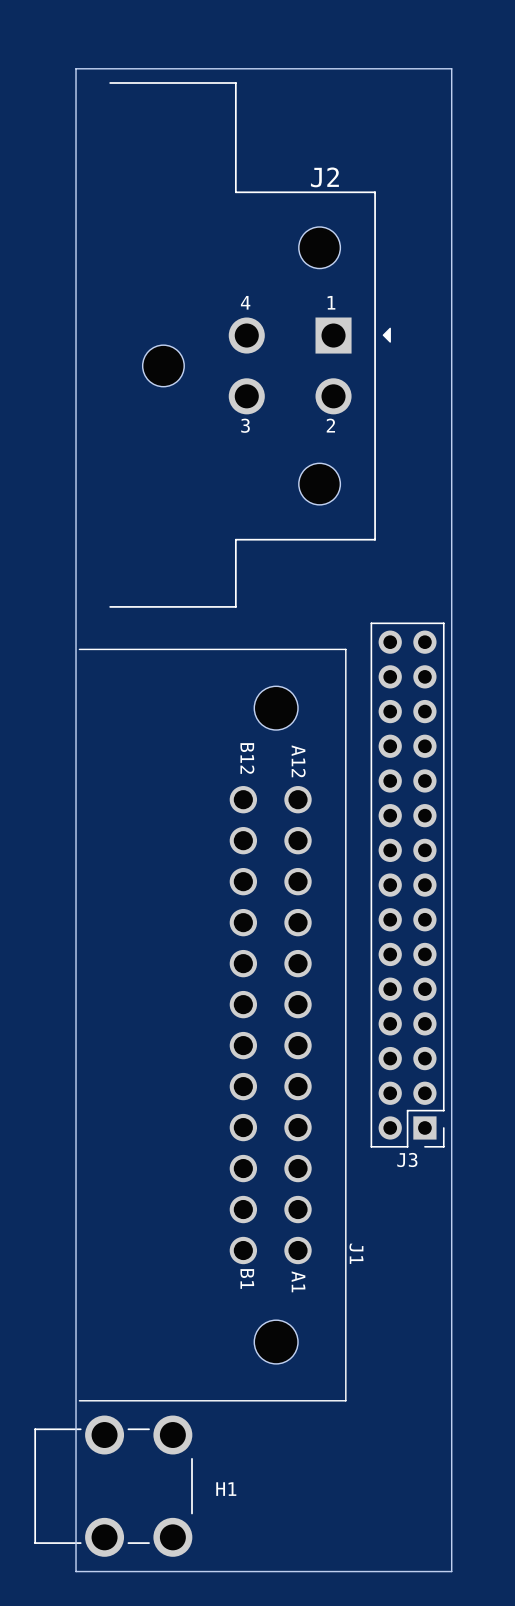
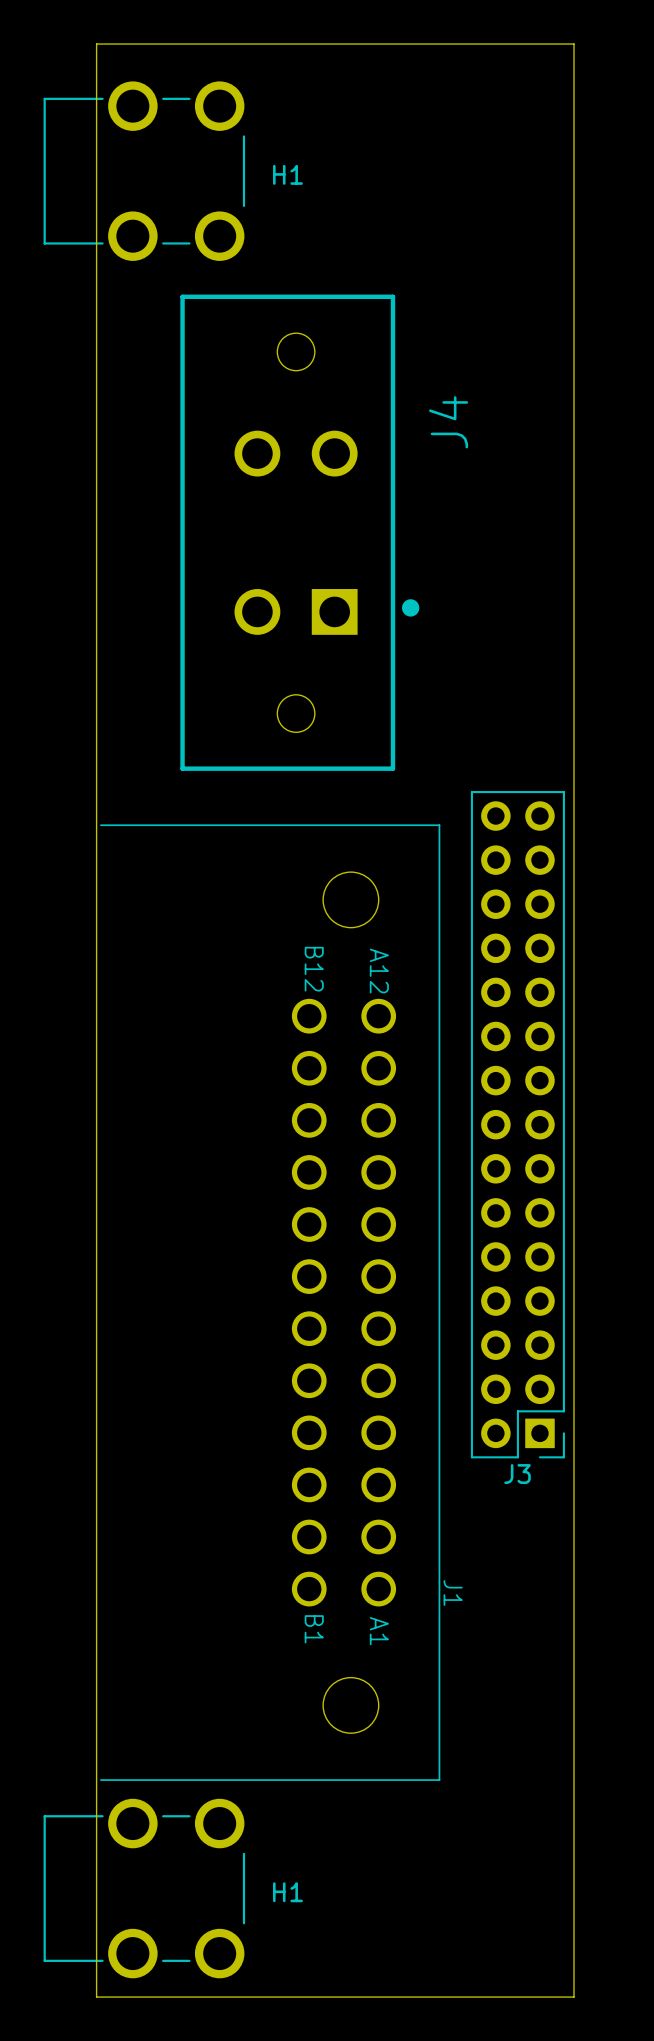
board edge: (76, 68) (451, 68) -> (96, 87) (96, 44) (574, 44) (574, 87)
H1: none -> (144, 171)
J2: (250, 344) -> none
J4: none -> (299, 532)

